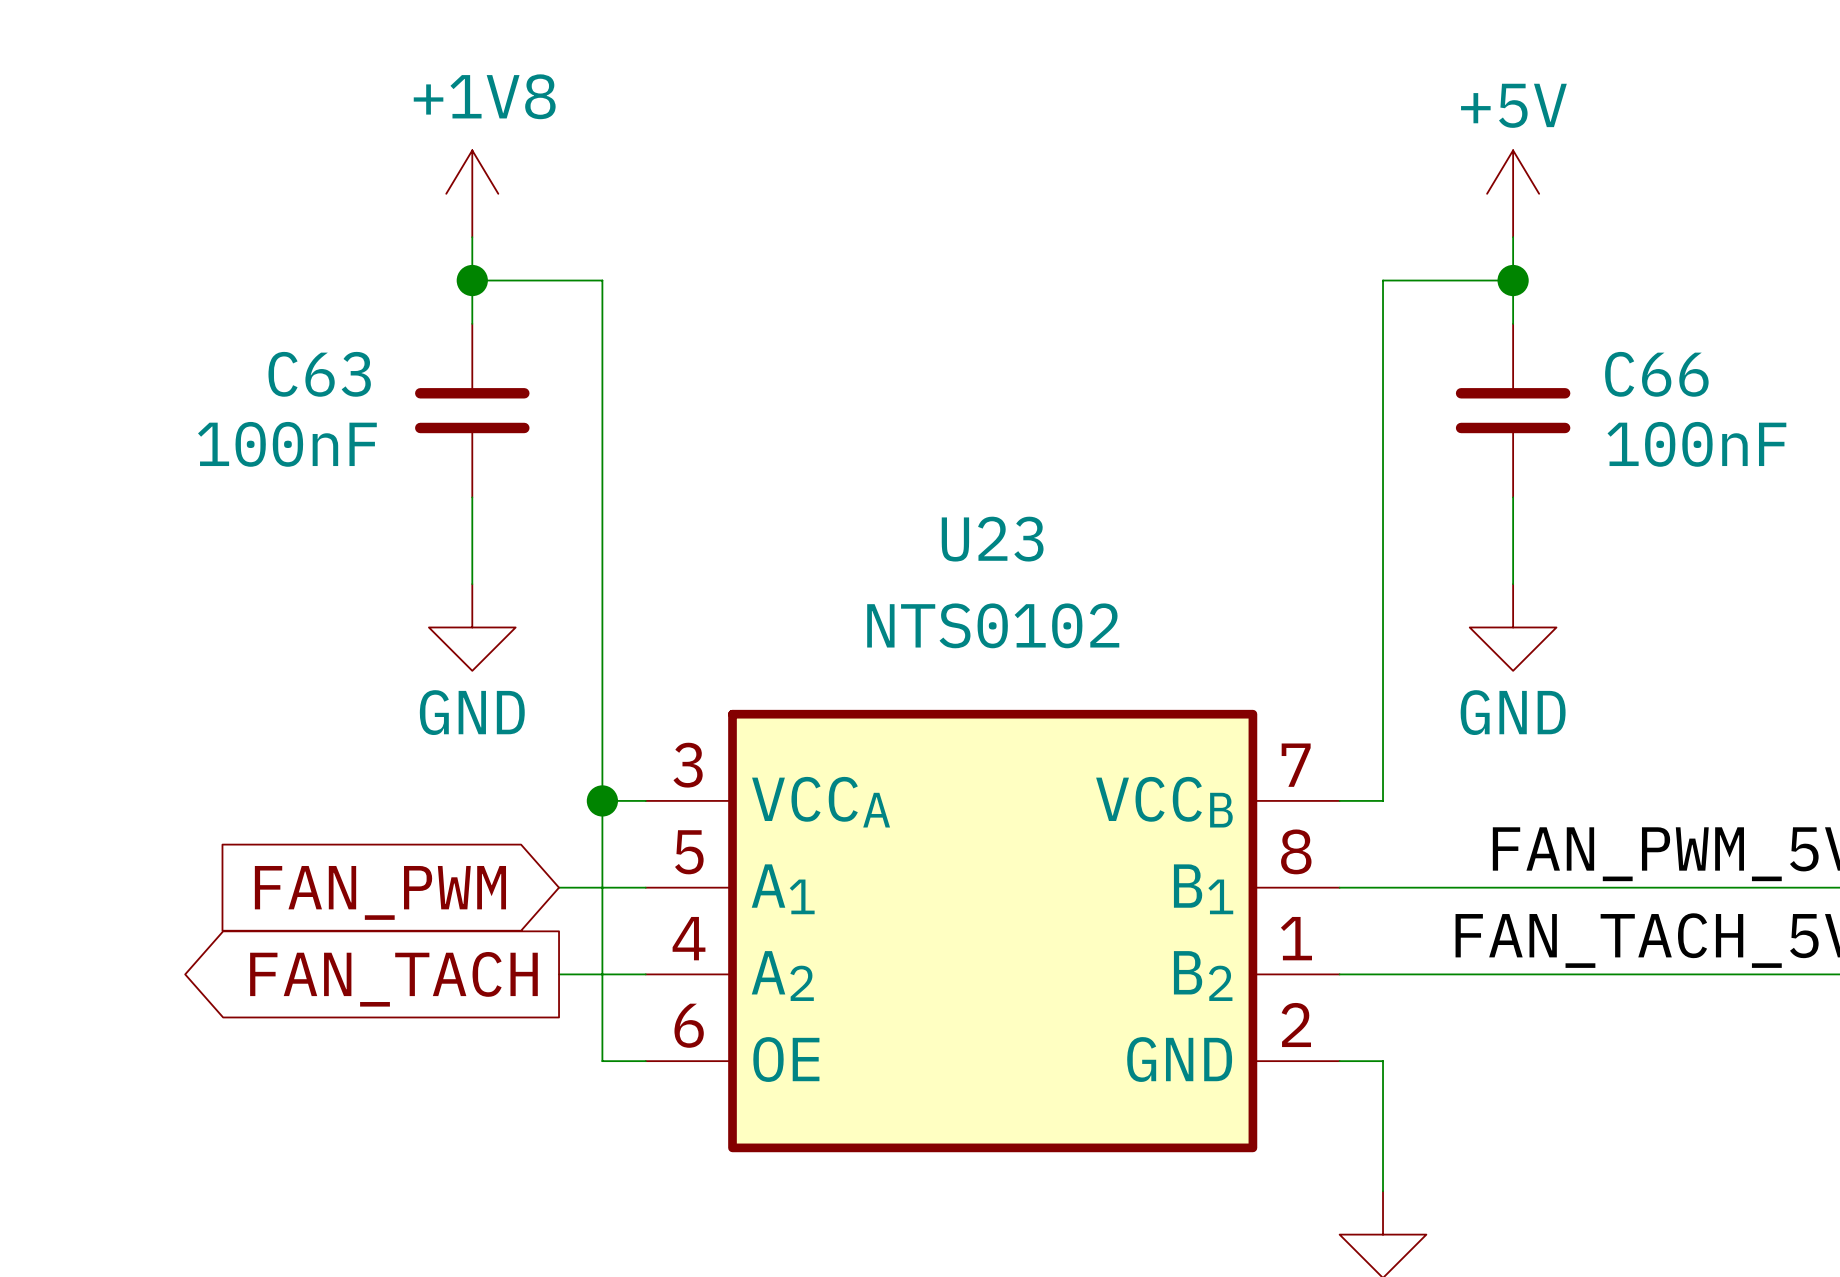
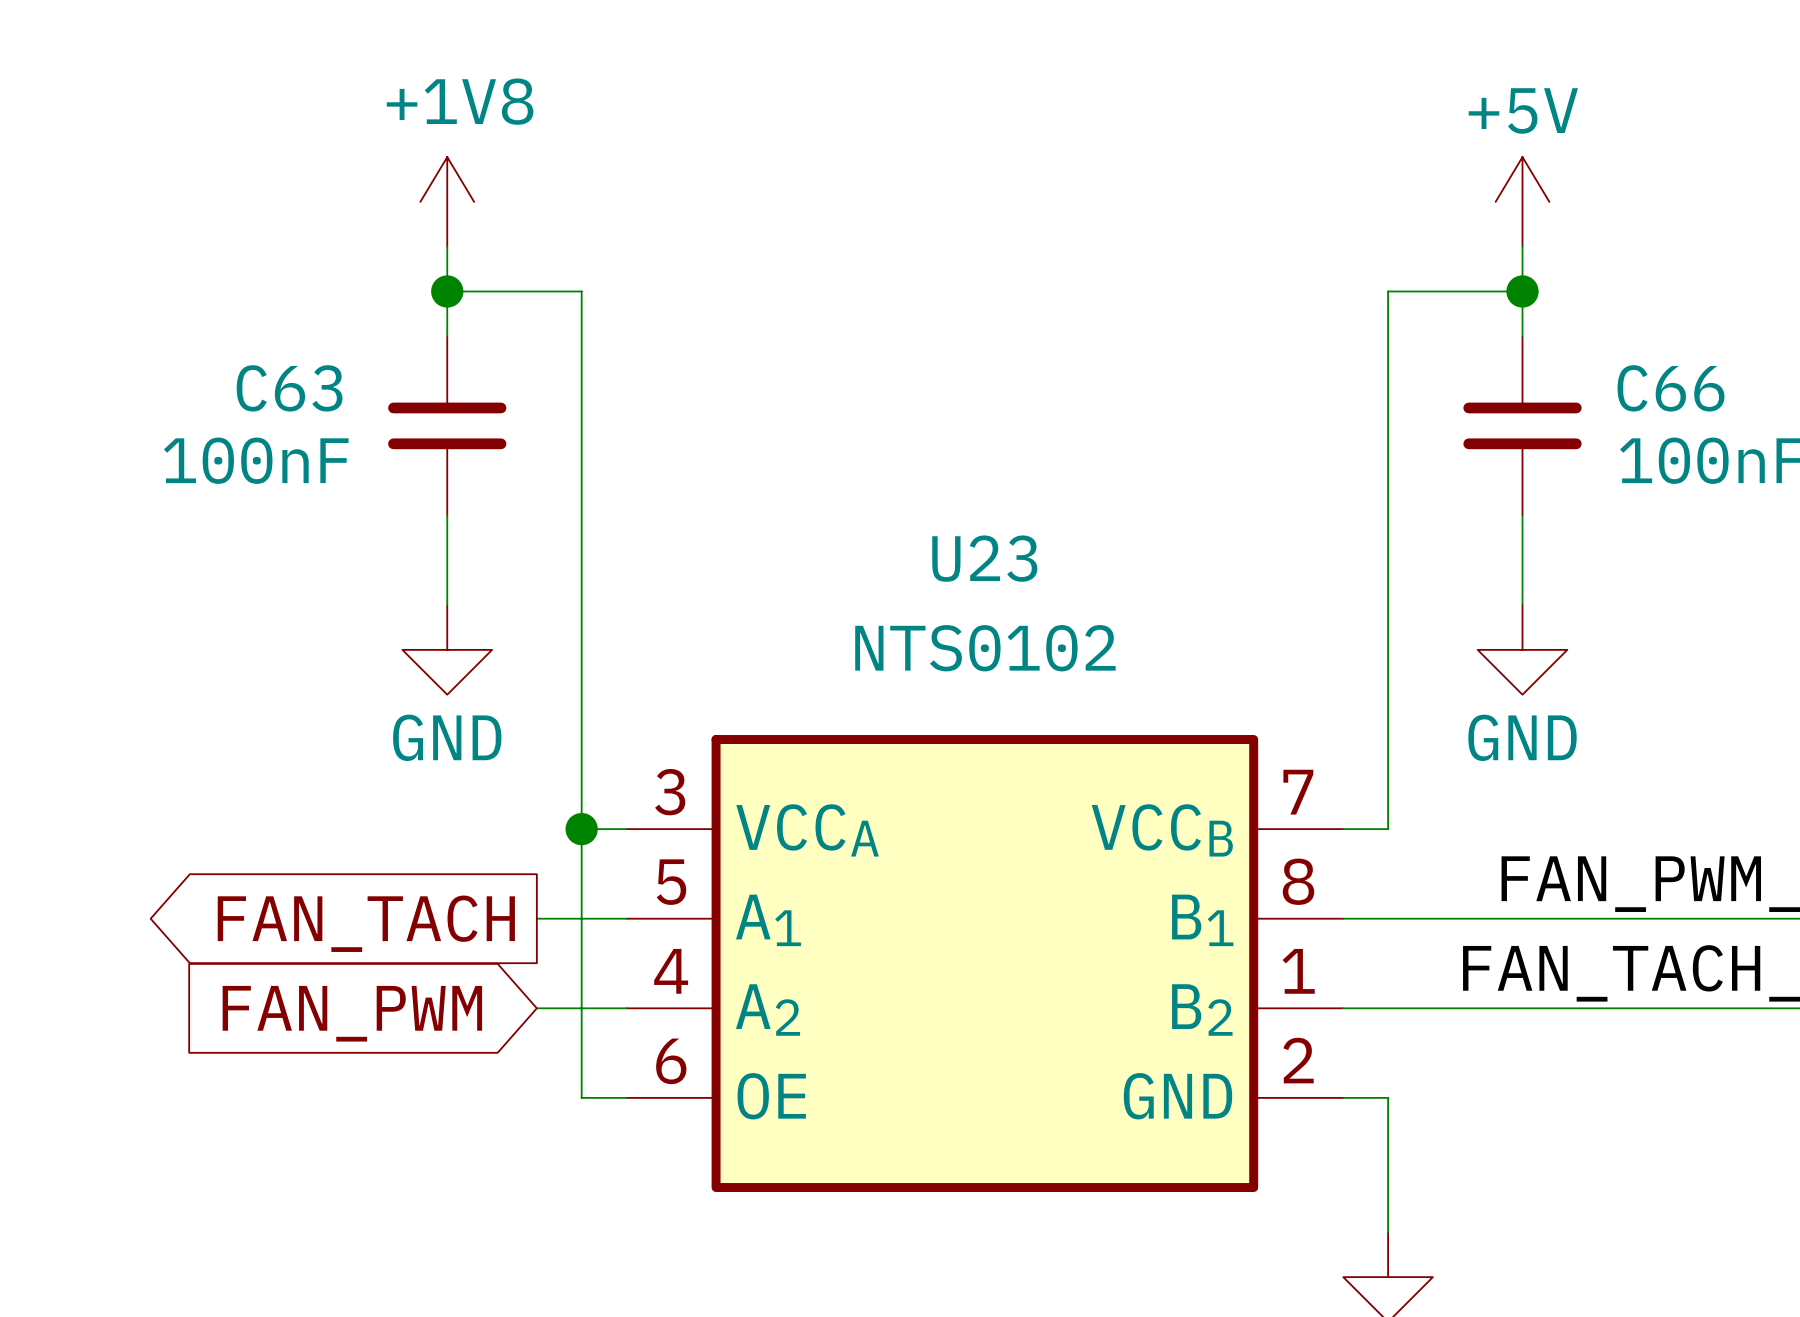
global label shape: input (380, 892) -> output (366, 923)
global label: FAN_PWM (380, 892) -> FAN_TACH (366, 923)
global label shape: output (393, 979) -> input (352, 1013)
global label: FAN_TACH (393, 979) -> FAN_PWM (352, 1013)

